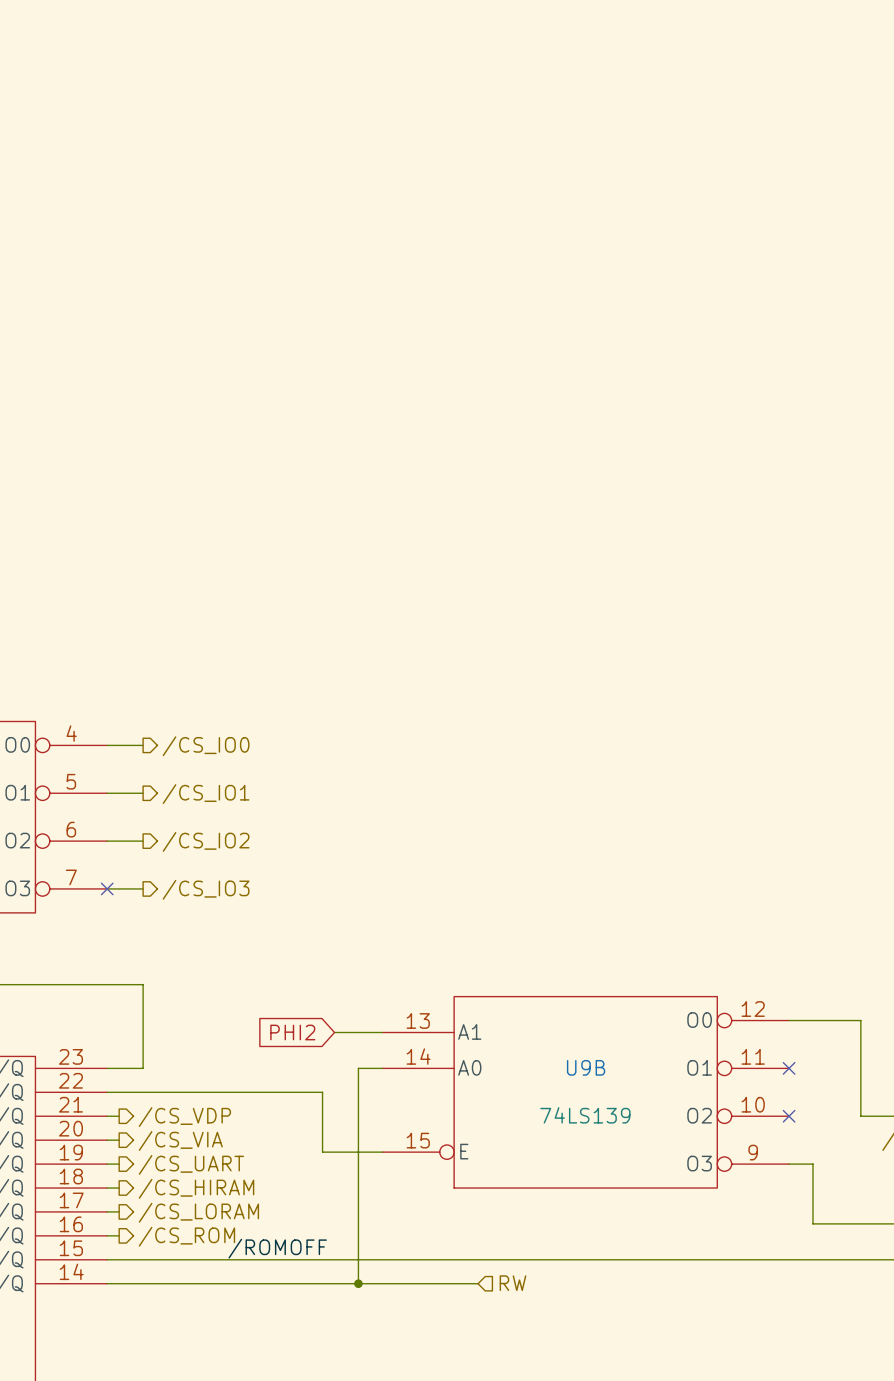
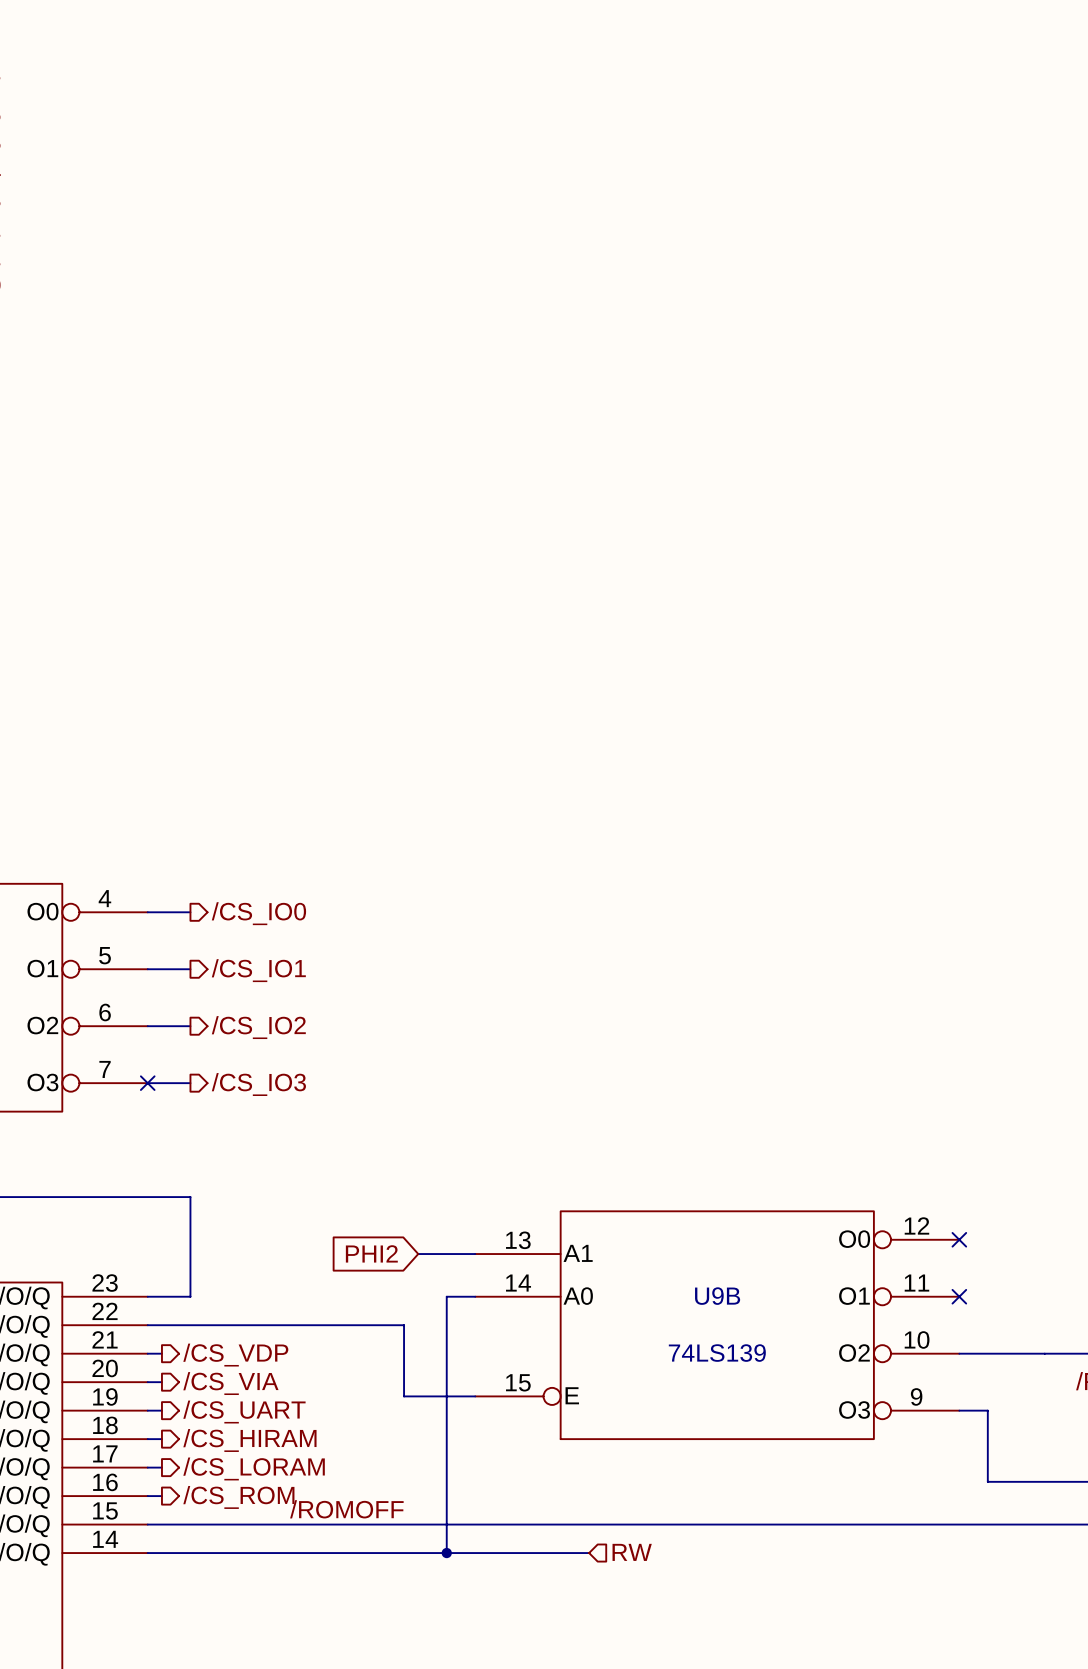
wire: (789, 1020) (860, 1020) (860, 1116) -> (959, 1353) (1044, 1353)
no-connect mark: none -> (959, 1239)
no-connect mark: (789, 1116) -> none

